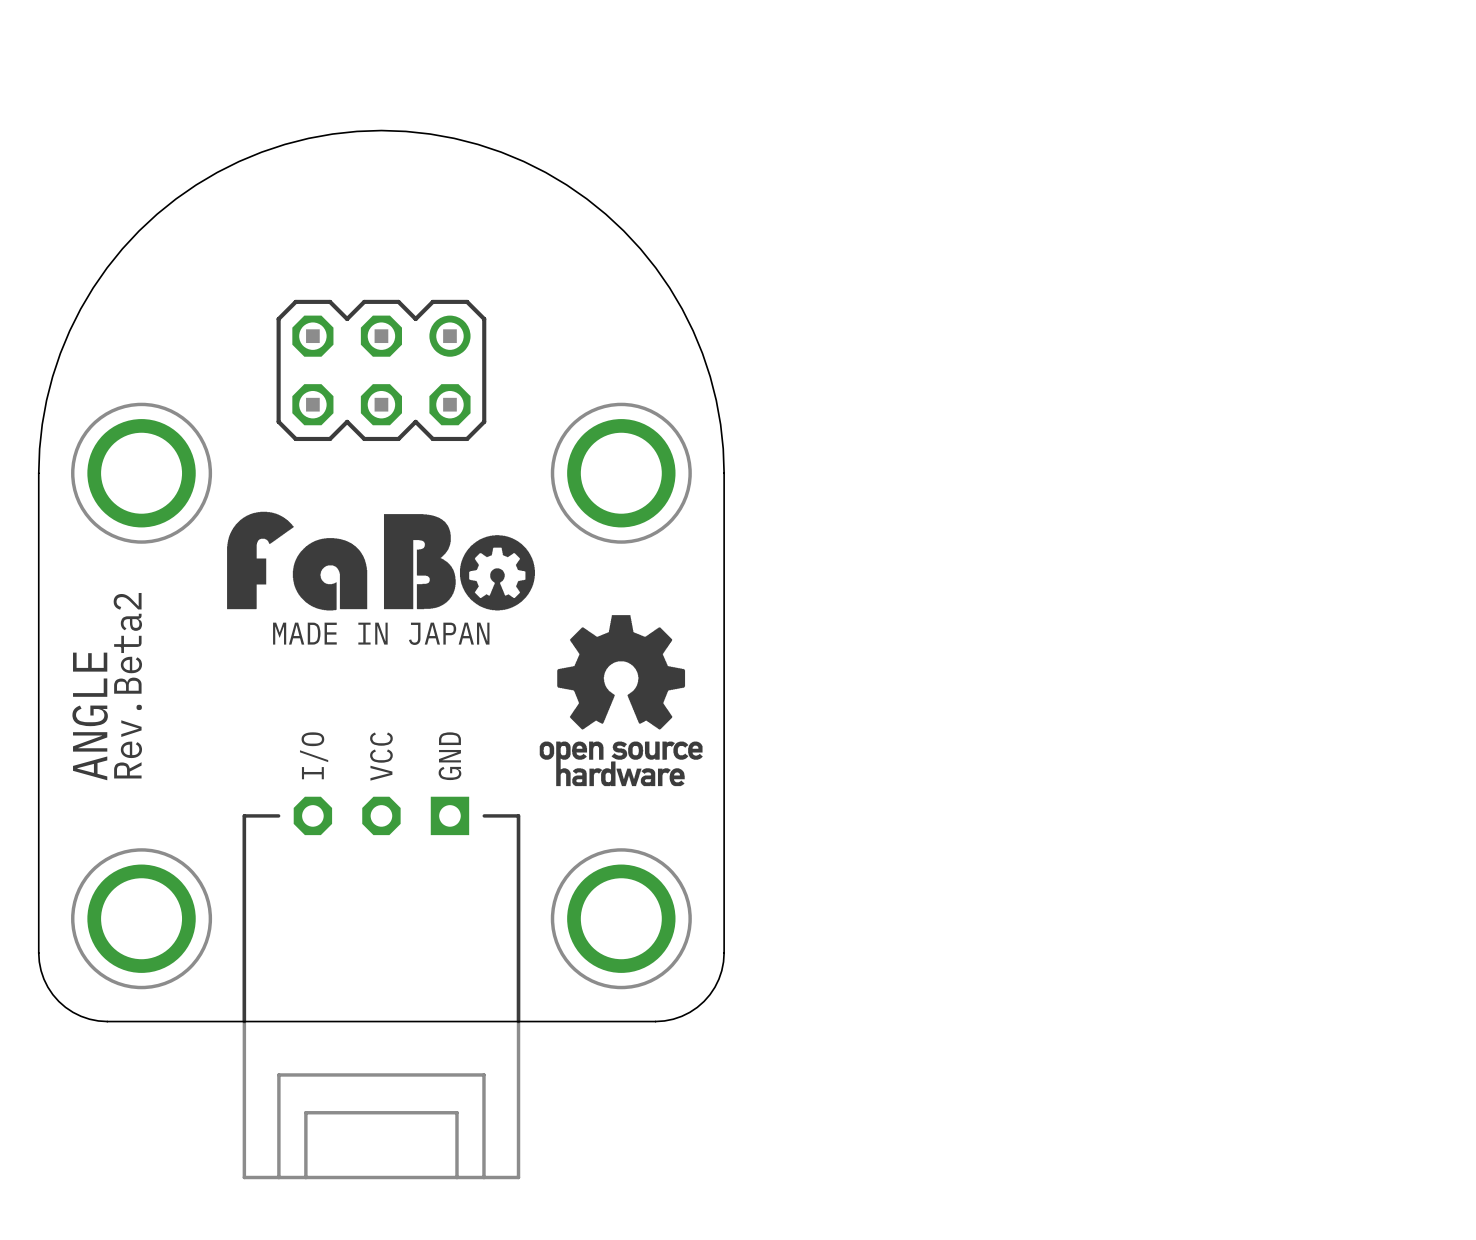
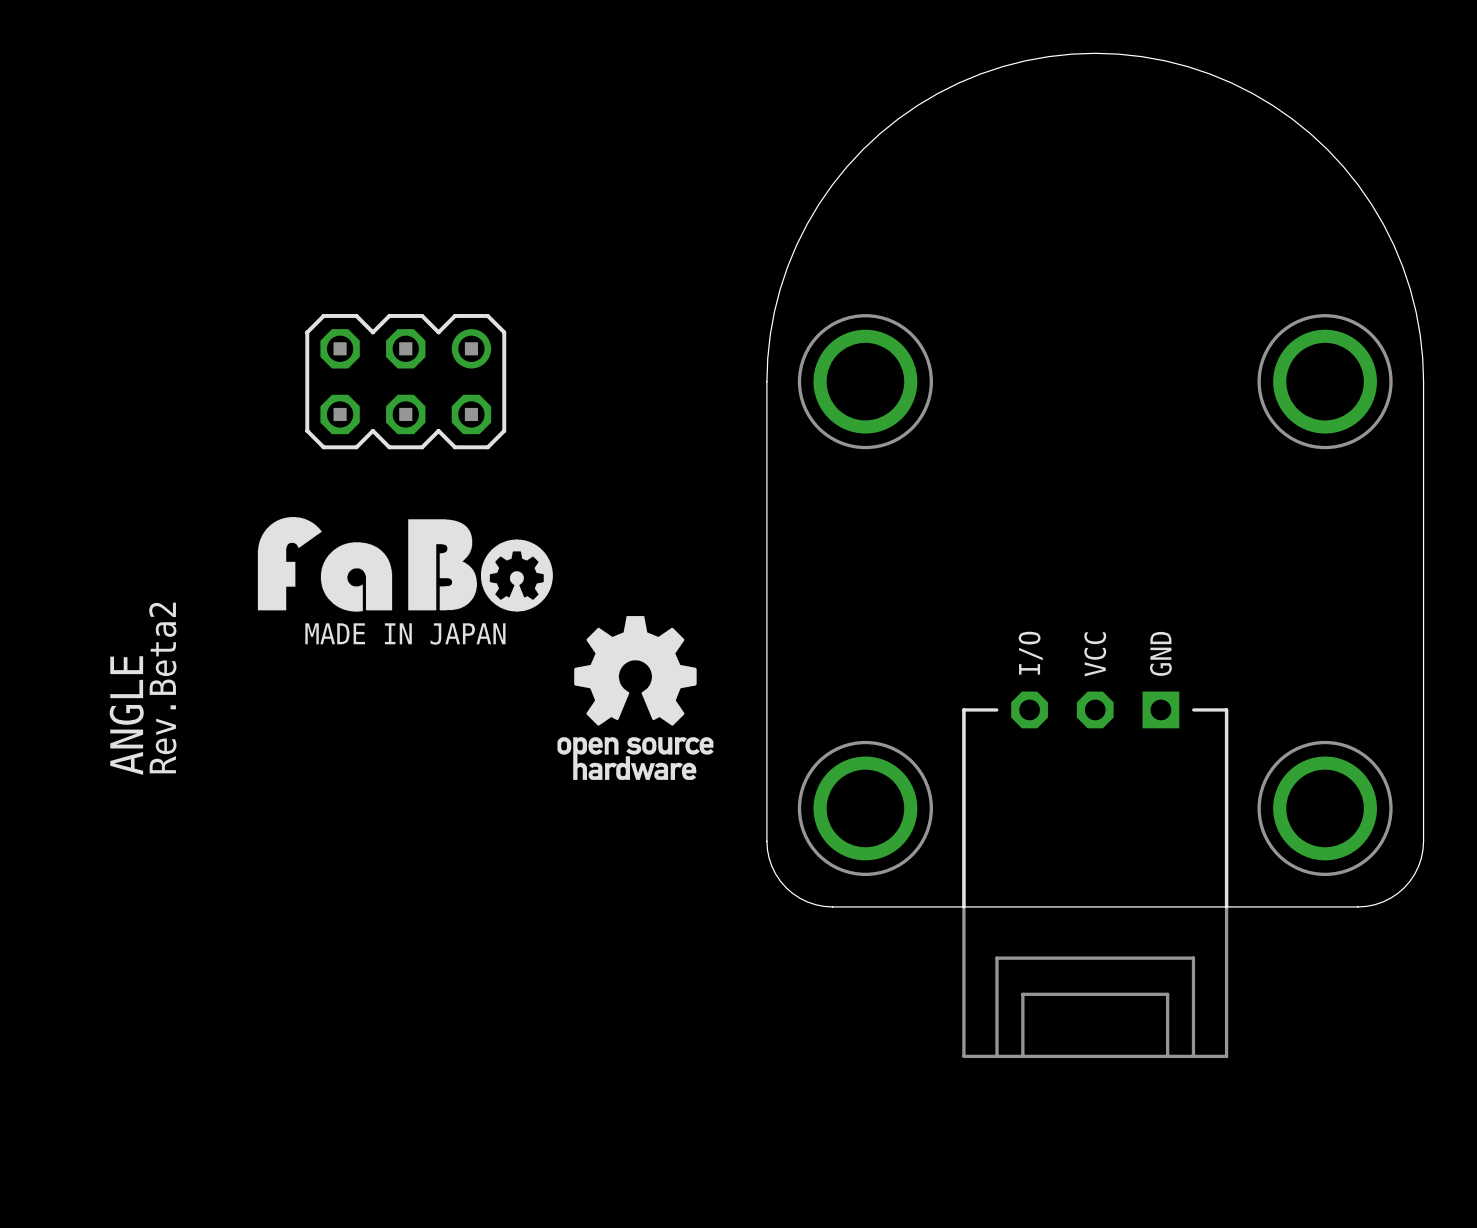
part: none -> (1095, 555)
part: (381, 654) -> none

